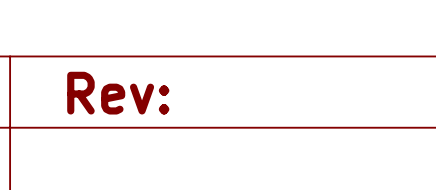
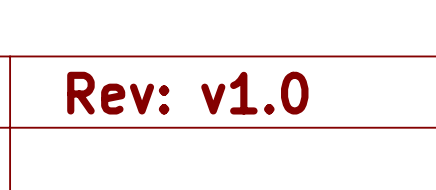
title block: Rev: (118, 93) -> Rev: v1.0 (187, 93)

